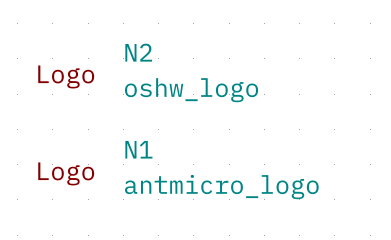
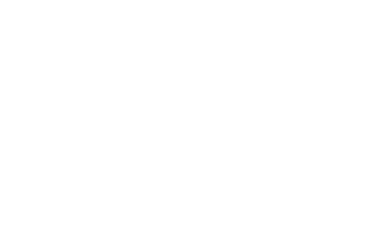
N2: oshw_logo (148, 72) -> none
N1: antmicro_logo (178, 170) -> none

